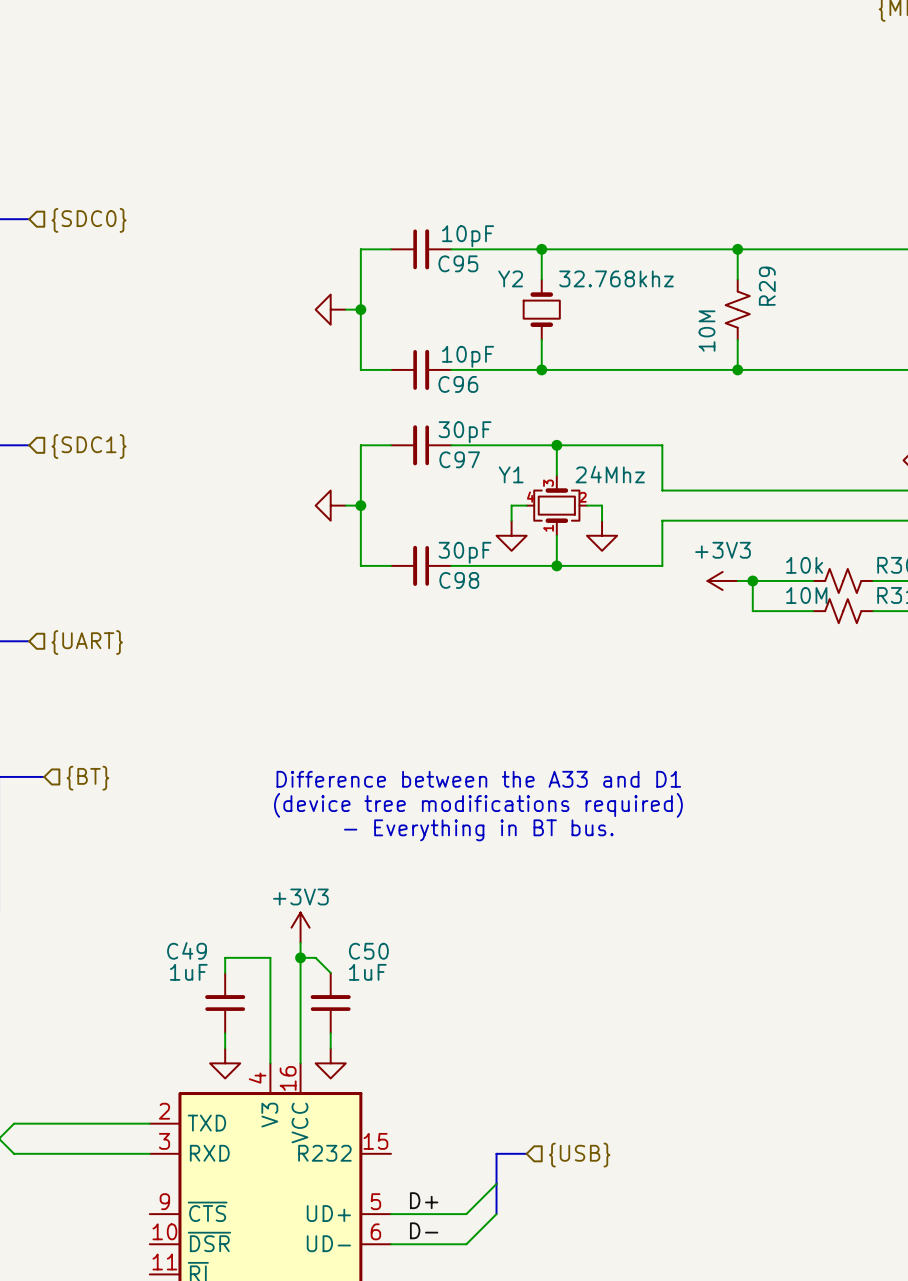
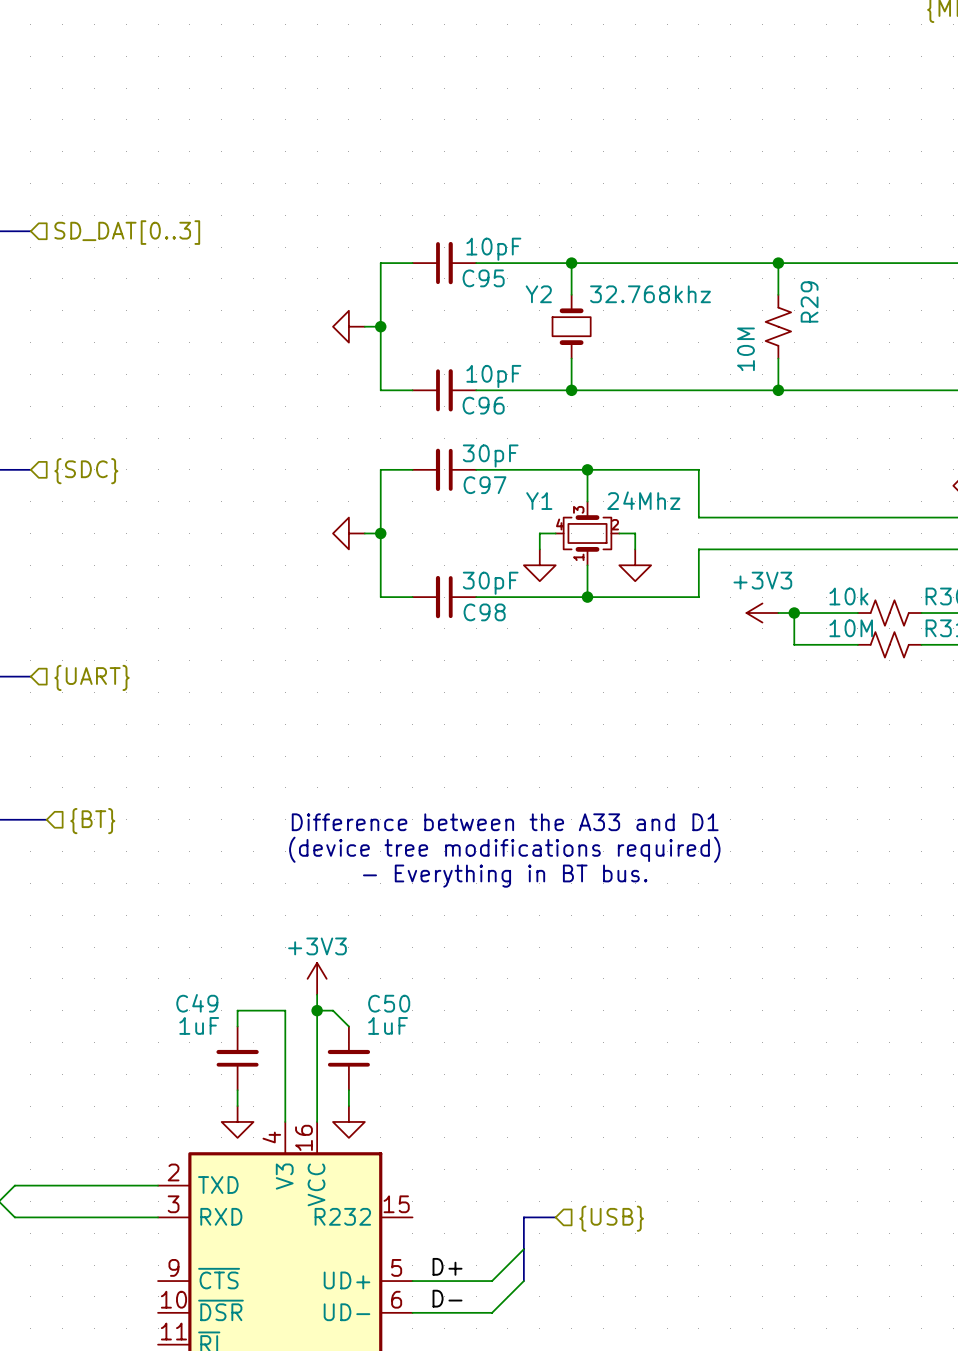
hierarchical label: {SDC0} (89, 220) -> SD_DAT[0..3] (127, 232)
hierarchical label: {SDC1} (89, 446) -> {SDC} (86, 471)

